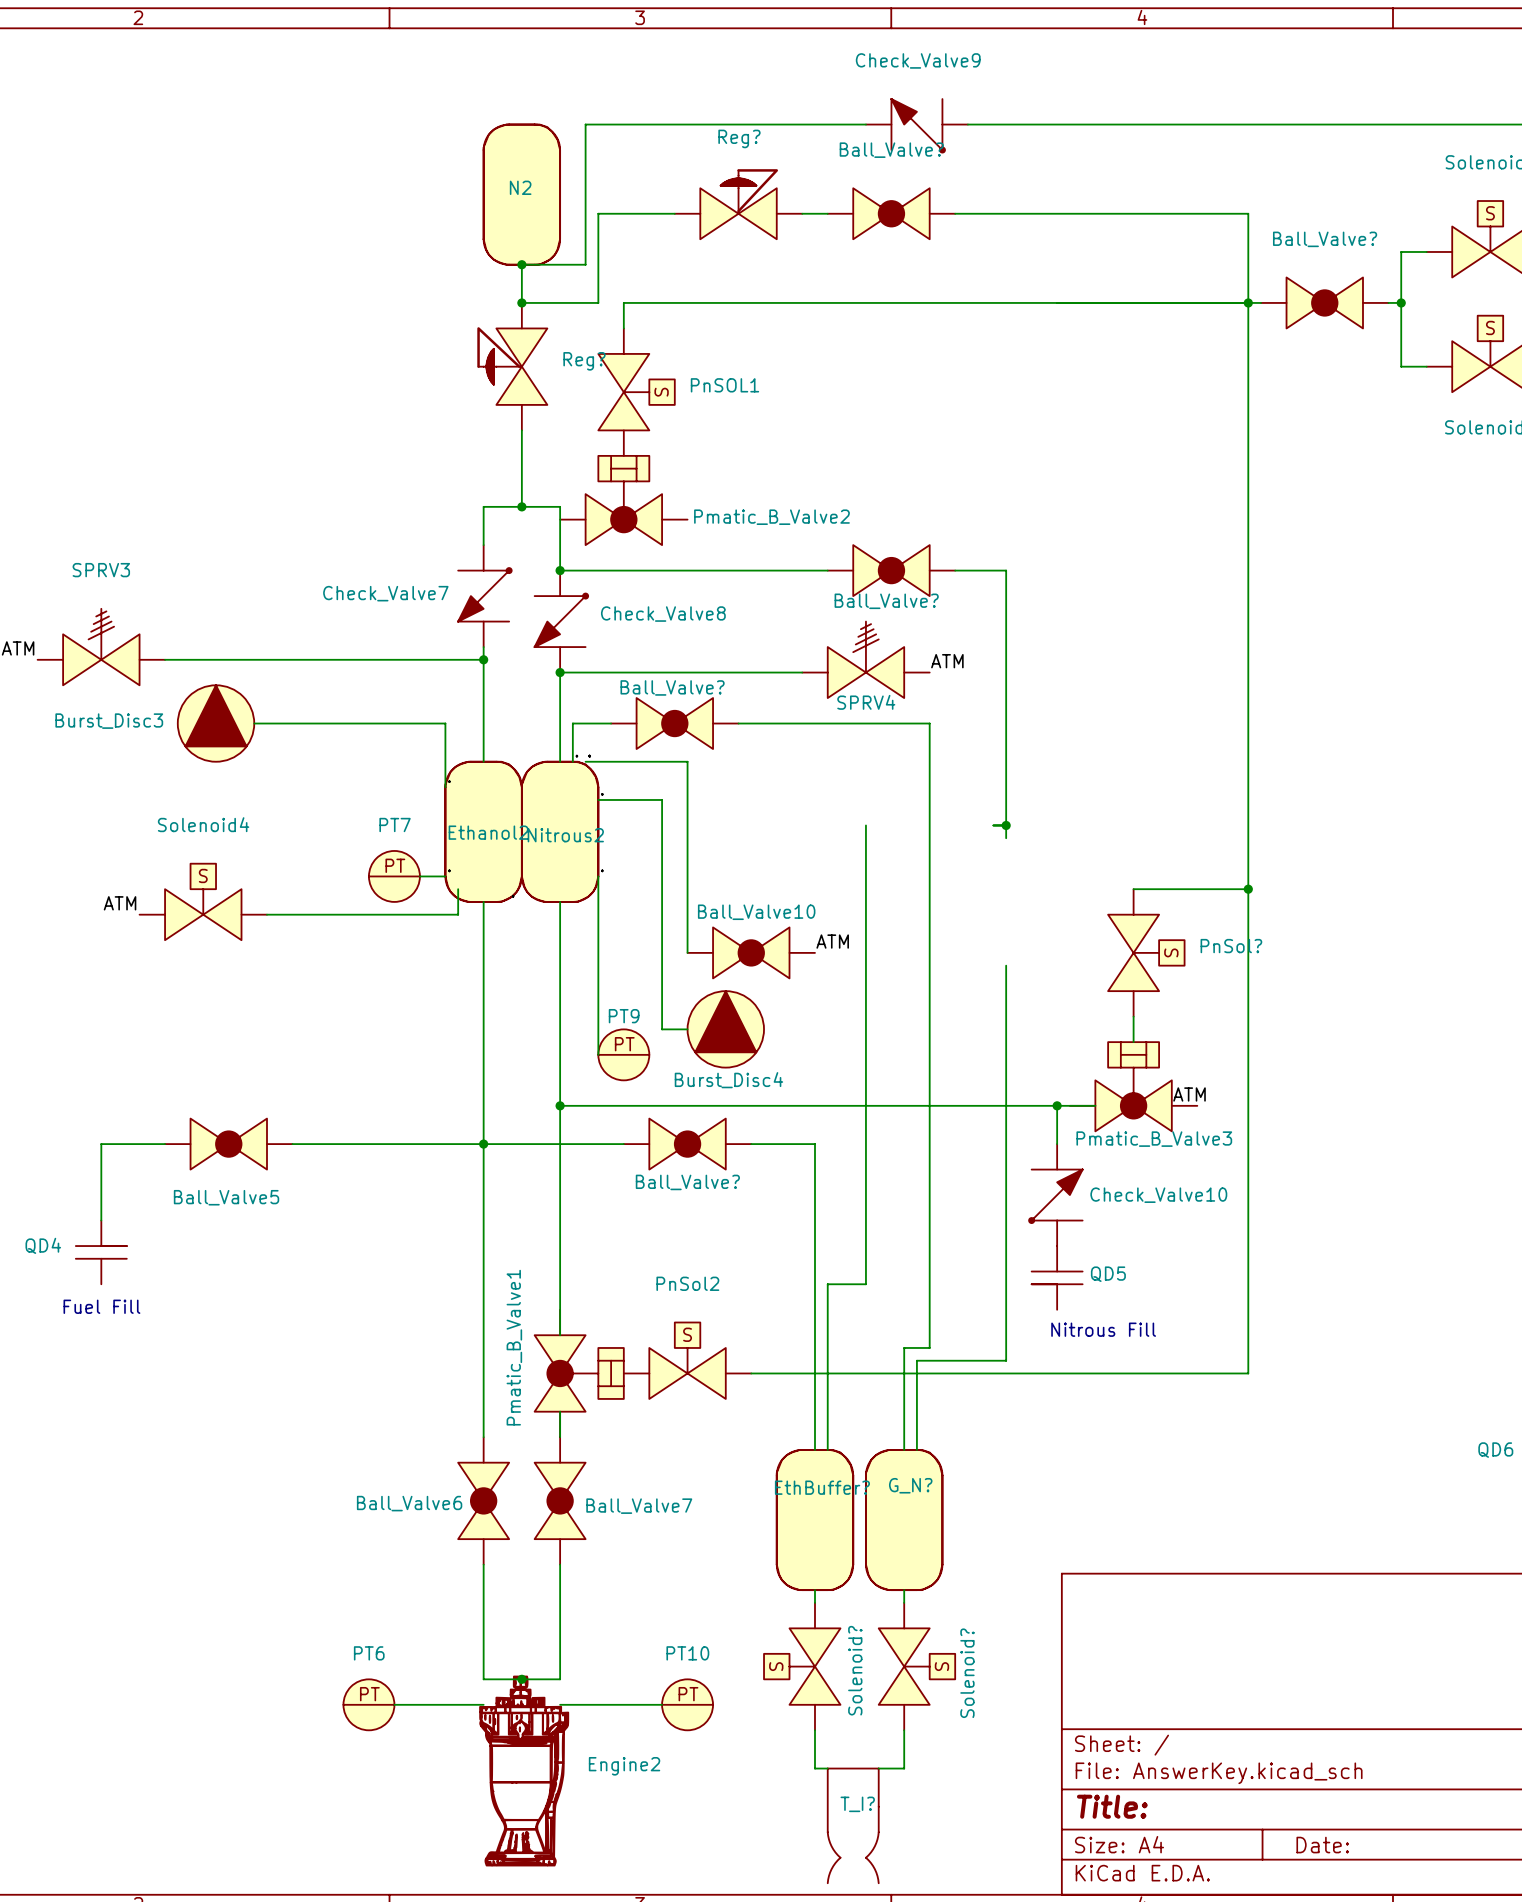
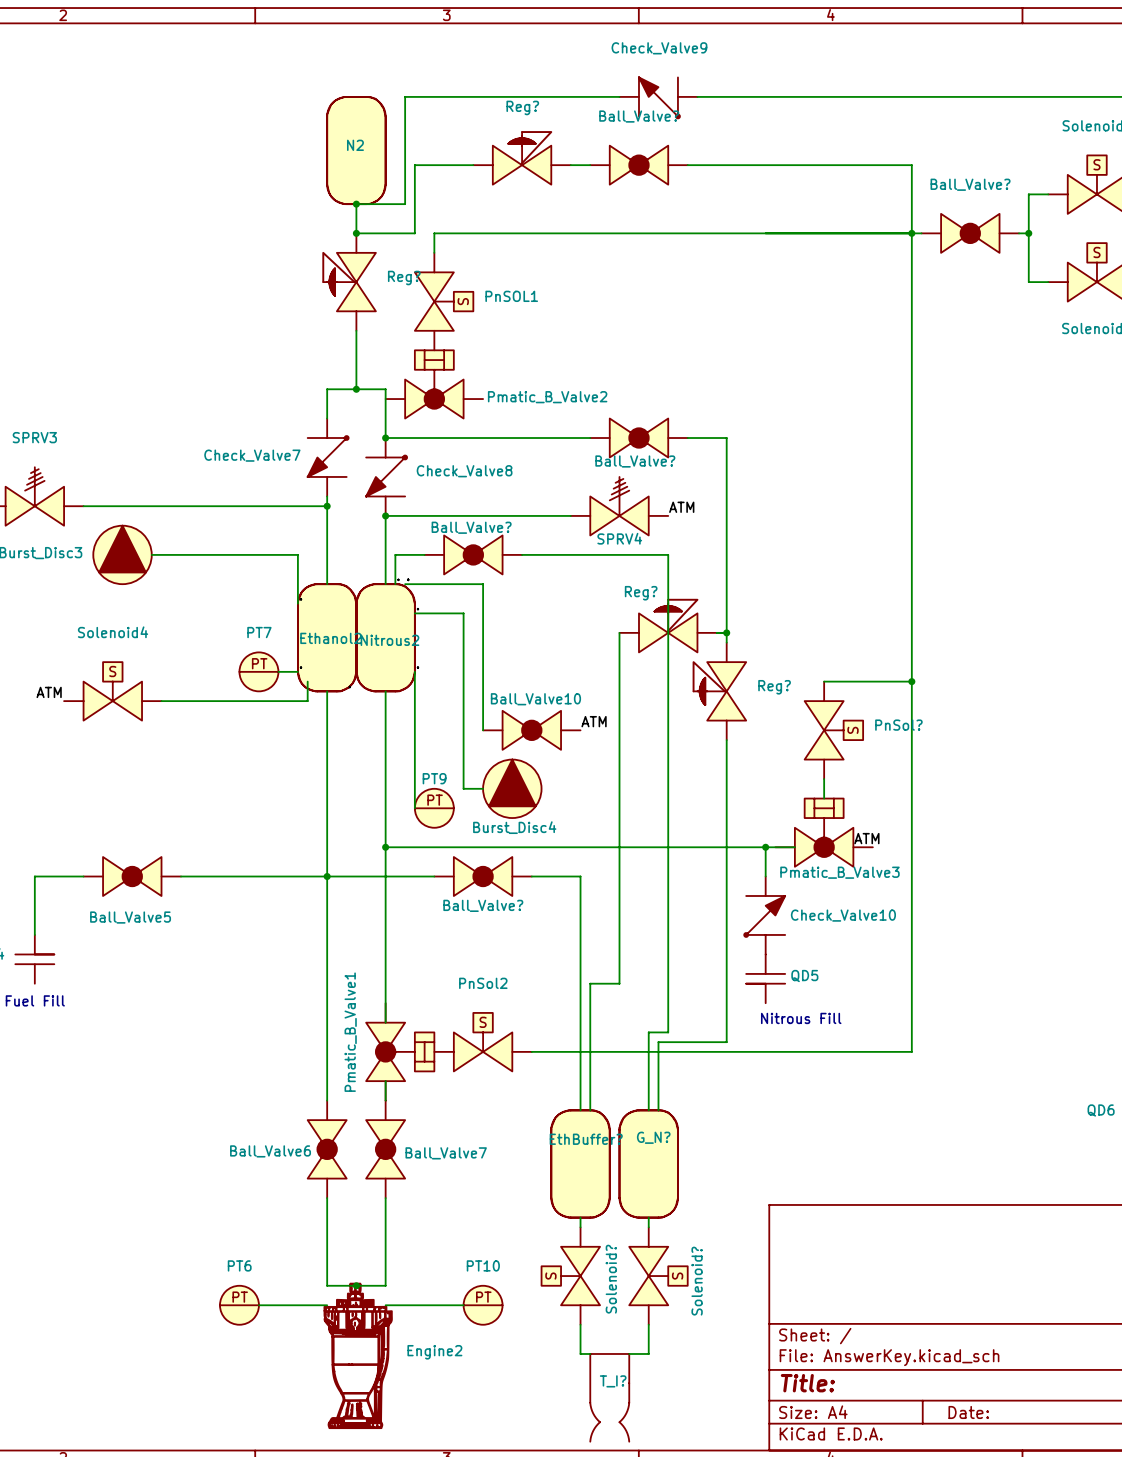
Reg?: none -> (668, 625)
Reg?: none -> (719, 691)

